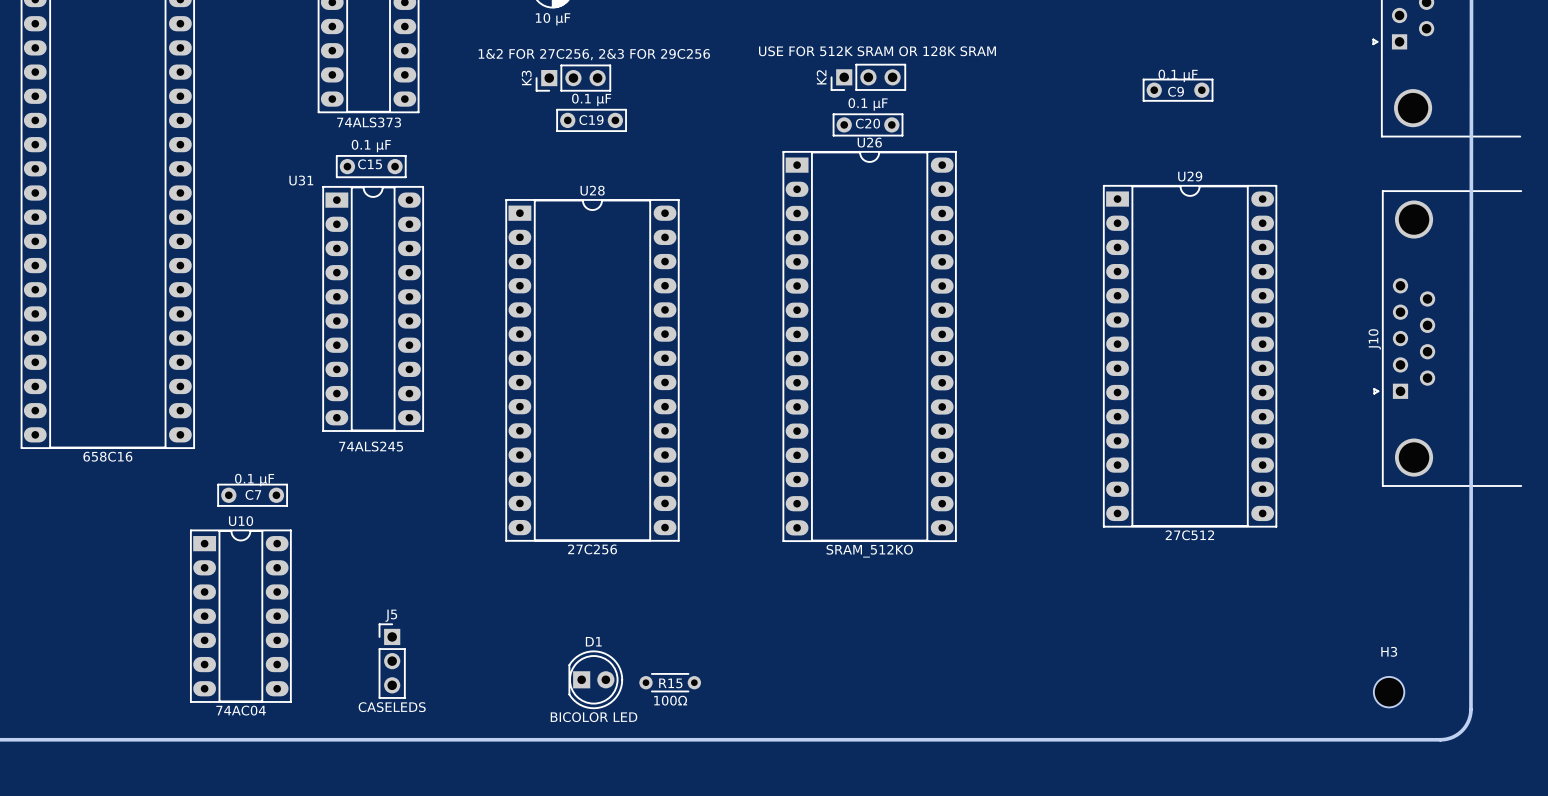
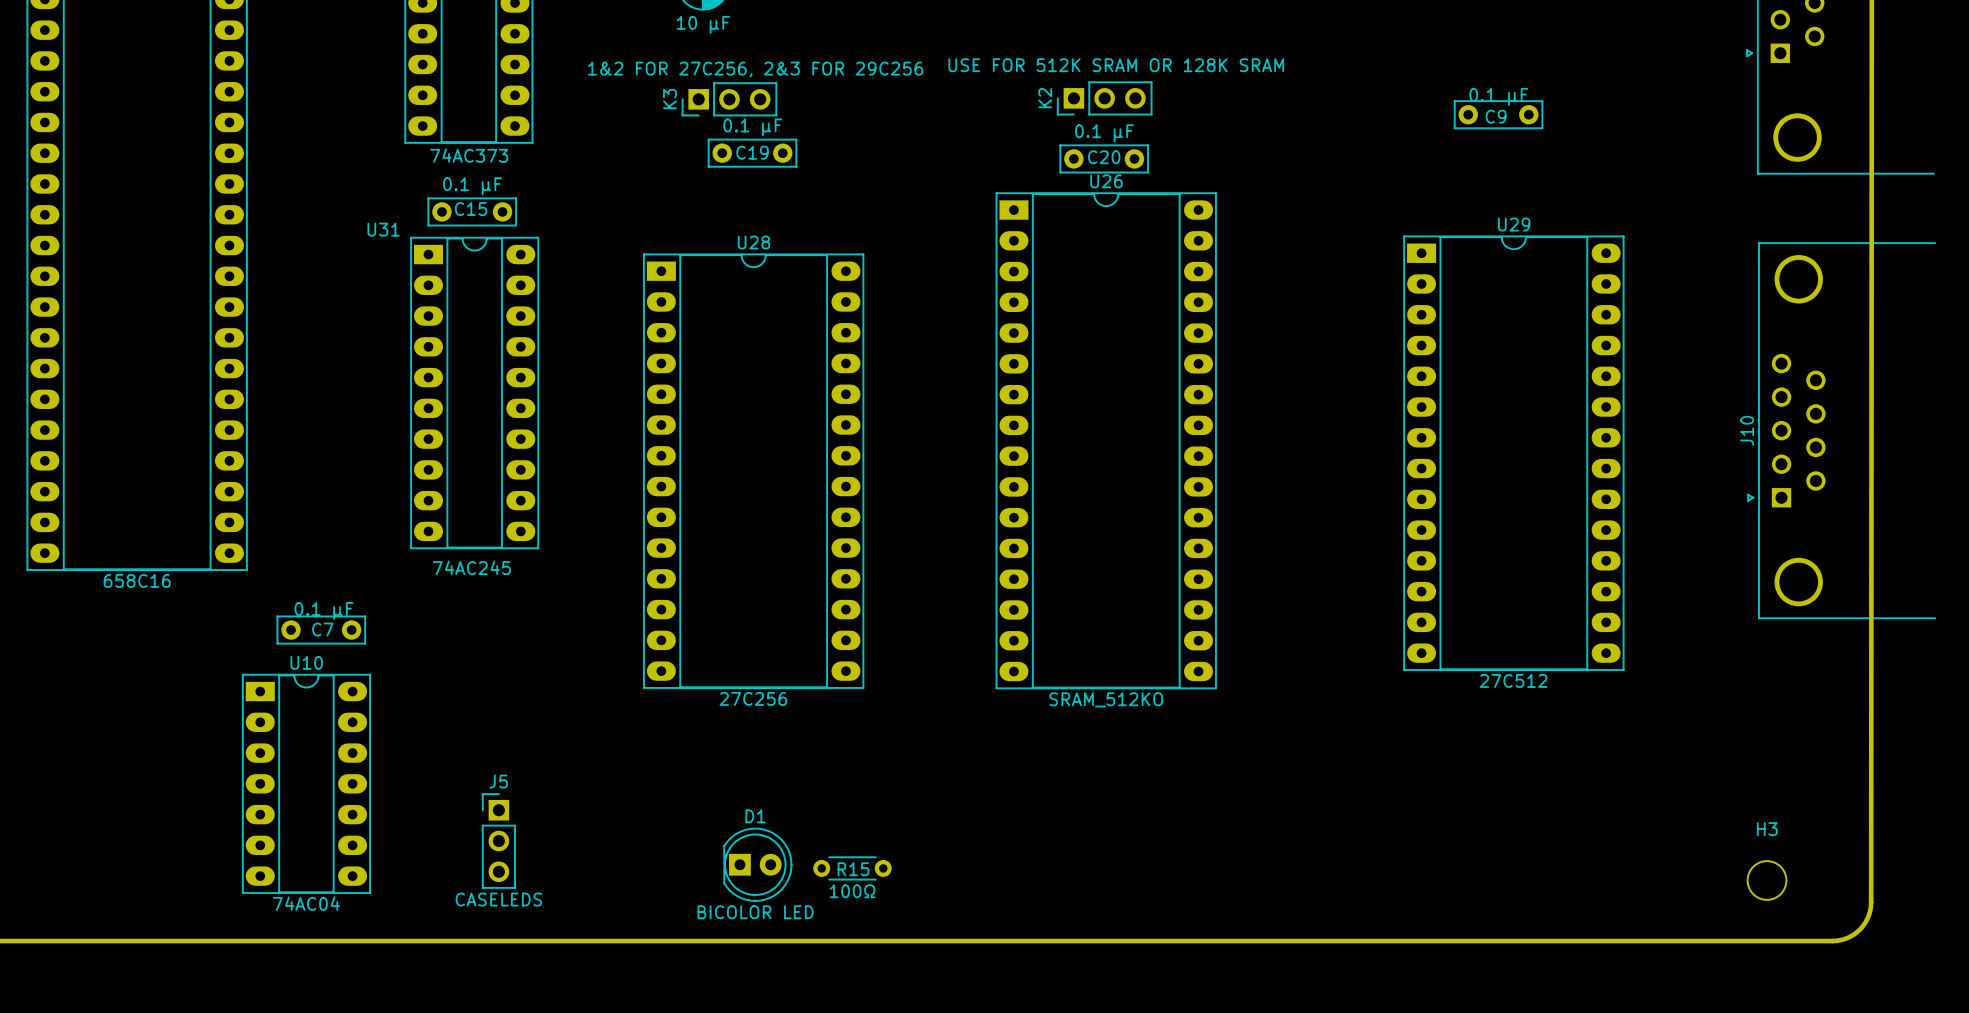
part value: 74ALS373 (369, 122) -> 74AC373 (469, 155)
U31 value: 74ALS245 (371, 446) -> 74AC245 (471, 567)

